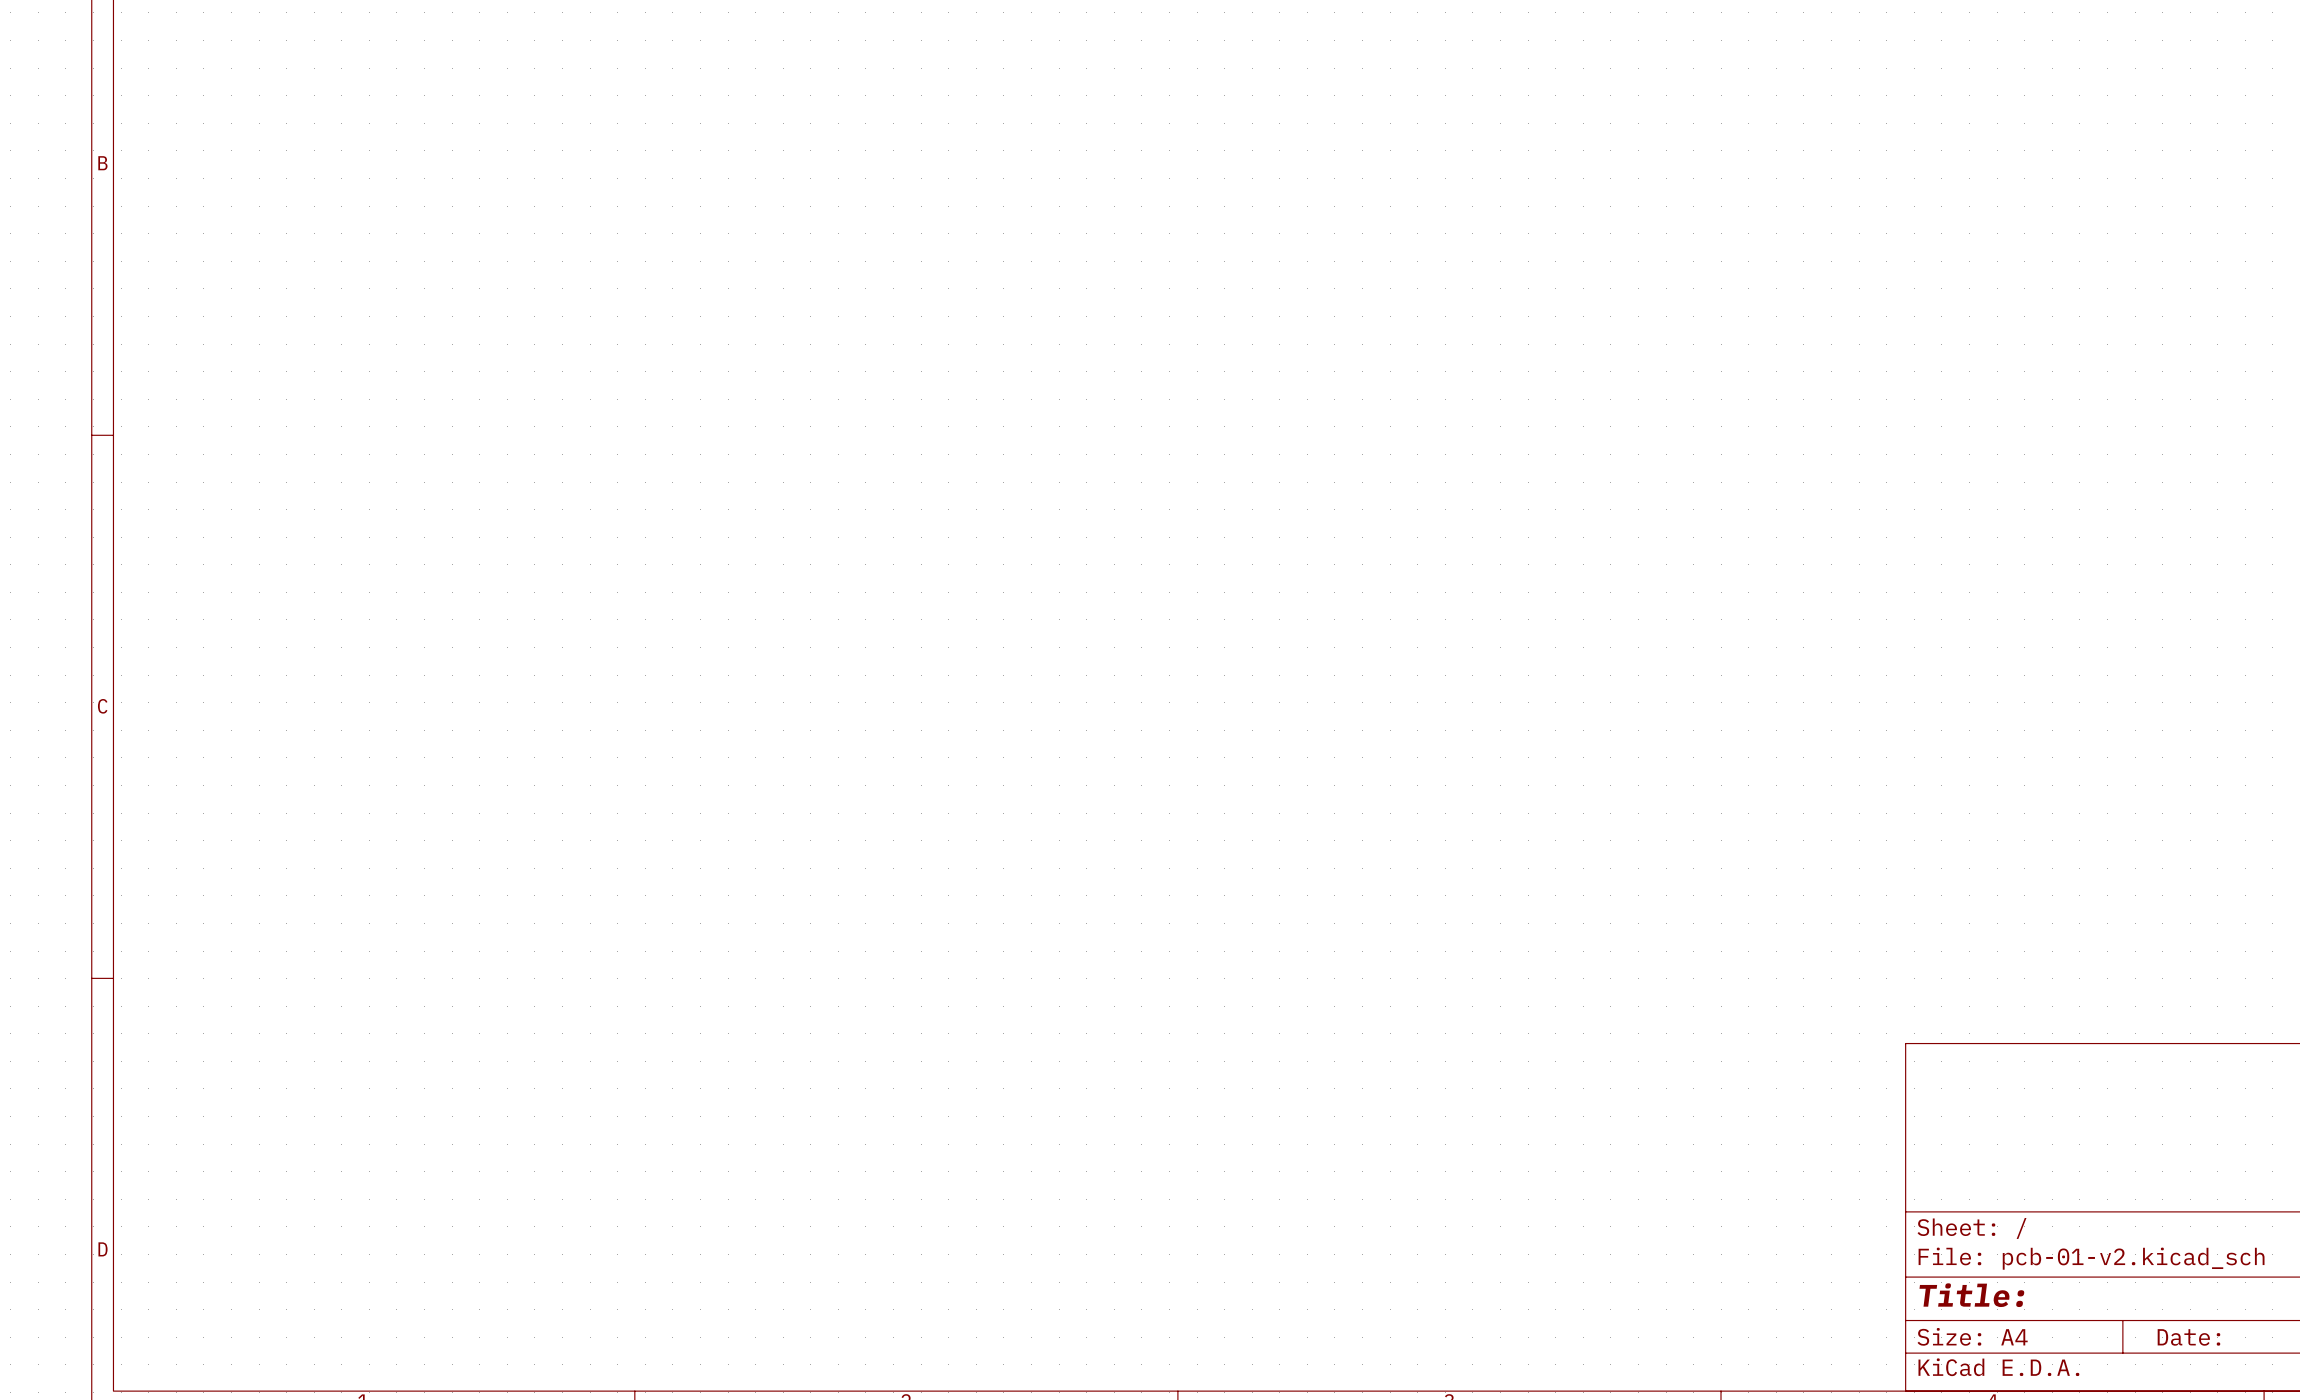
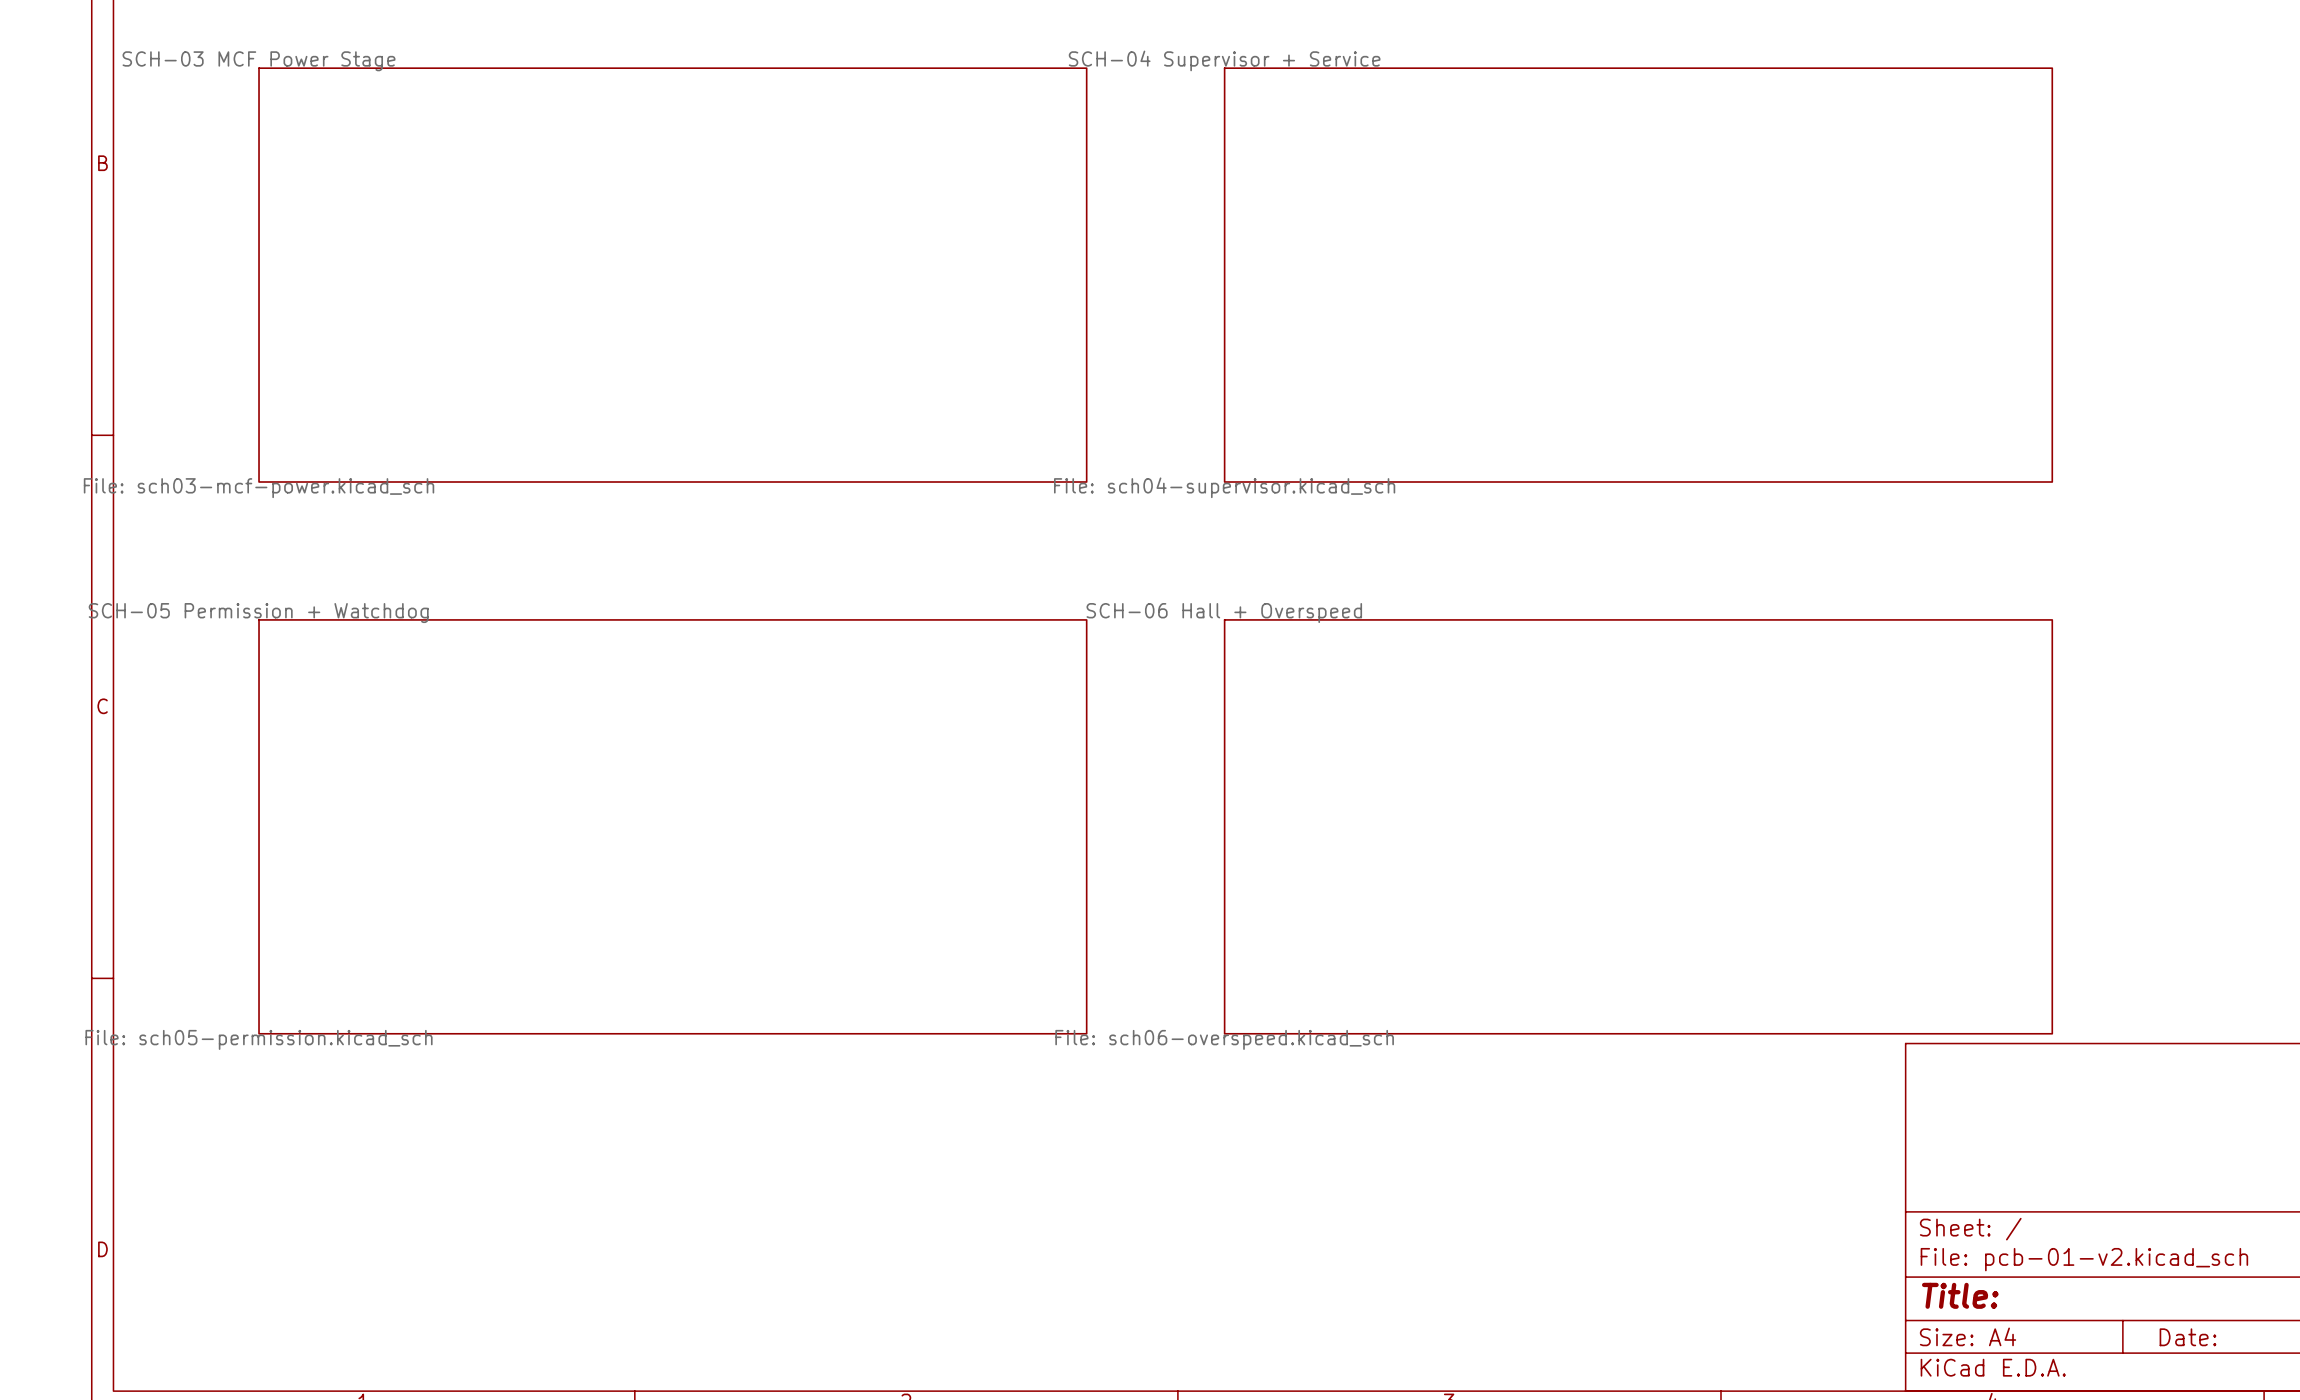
sheet SCH-03 MCF Power Stage: none -> File: sch03-mcf-power.kicad_sch (672, 275)
sheet SCH-04 Supervisor + Service: none -> File: sch04-supervisor.kicad_sch (1638, 275)
sheet SCH-05 Permission + Watchdog: none -> File: sch05-permission.kicad_sch (672, 826)
sheet SCH-06 Hall + Overspeed: none -> File: sch06-overspeed.kicad_sch (1638, 826)

